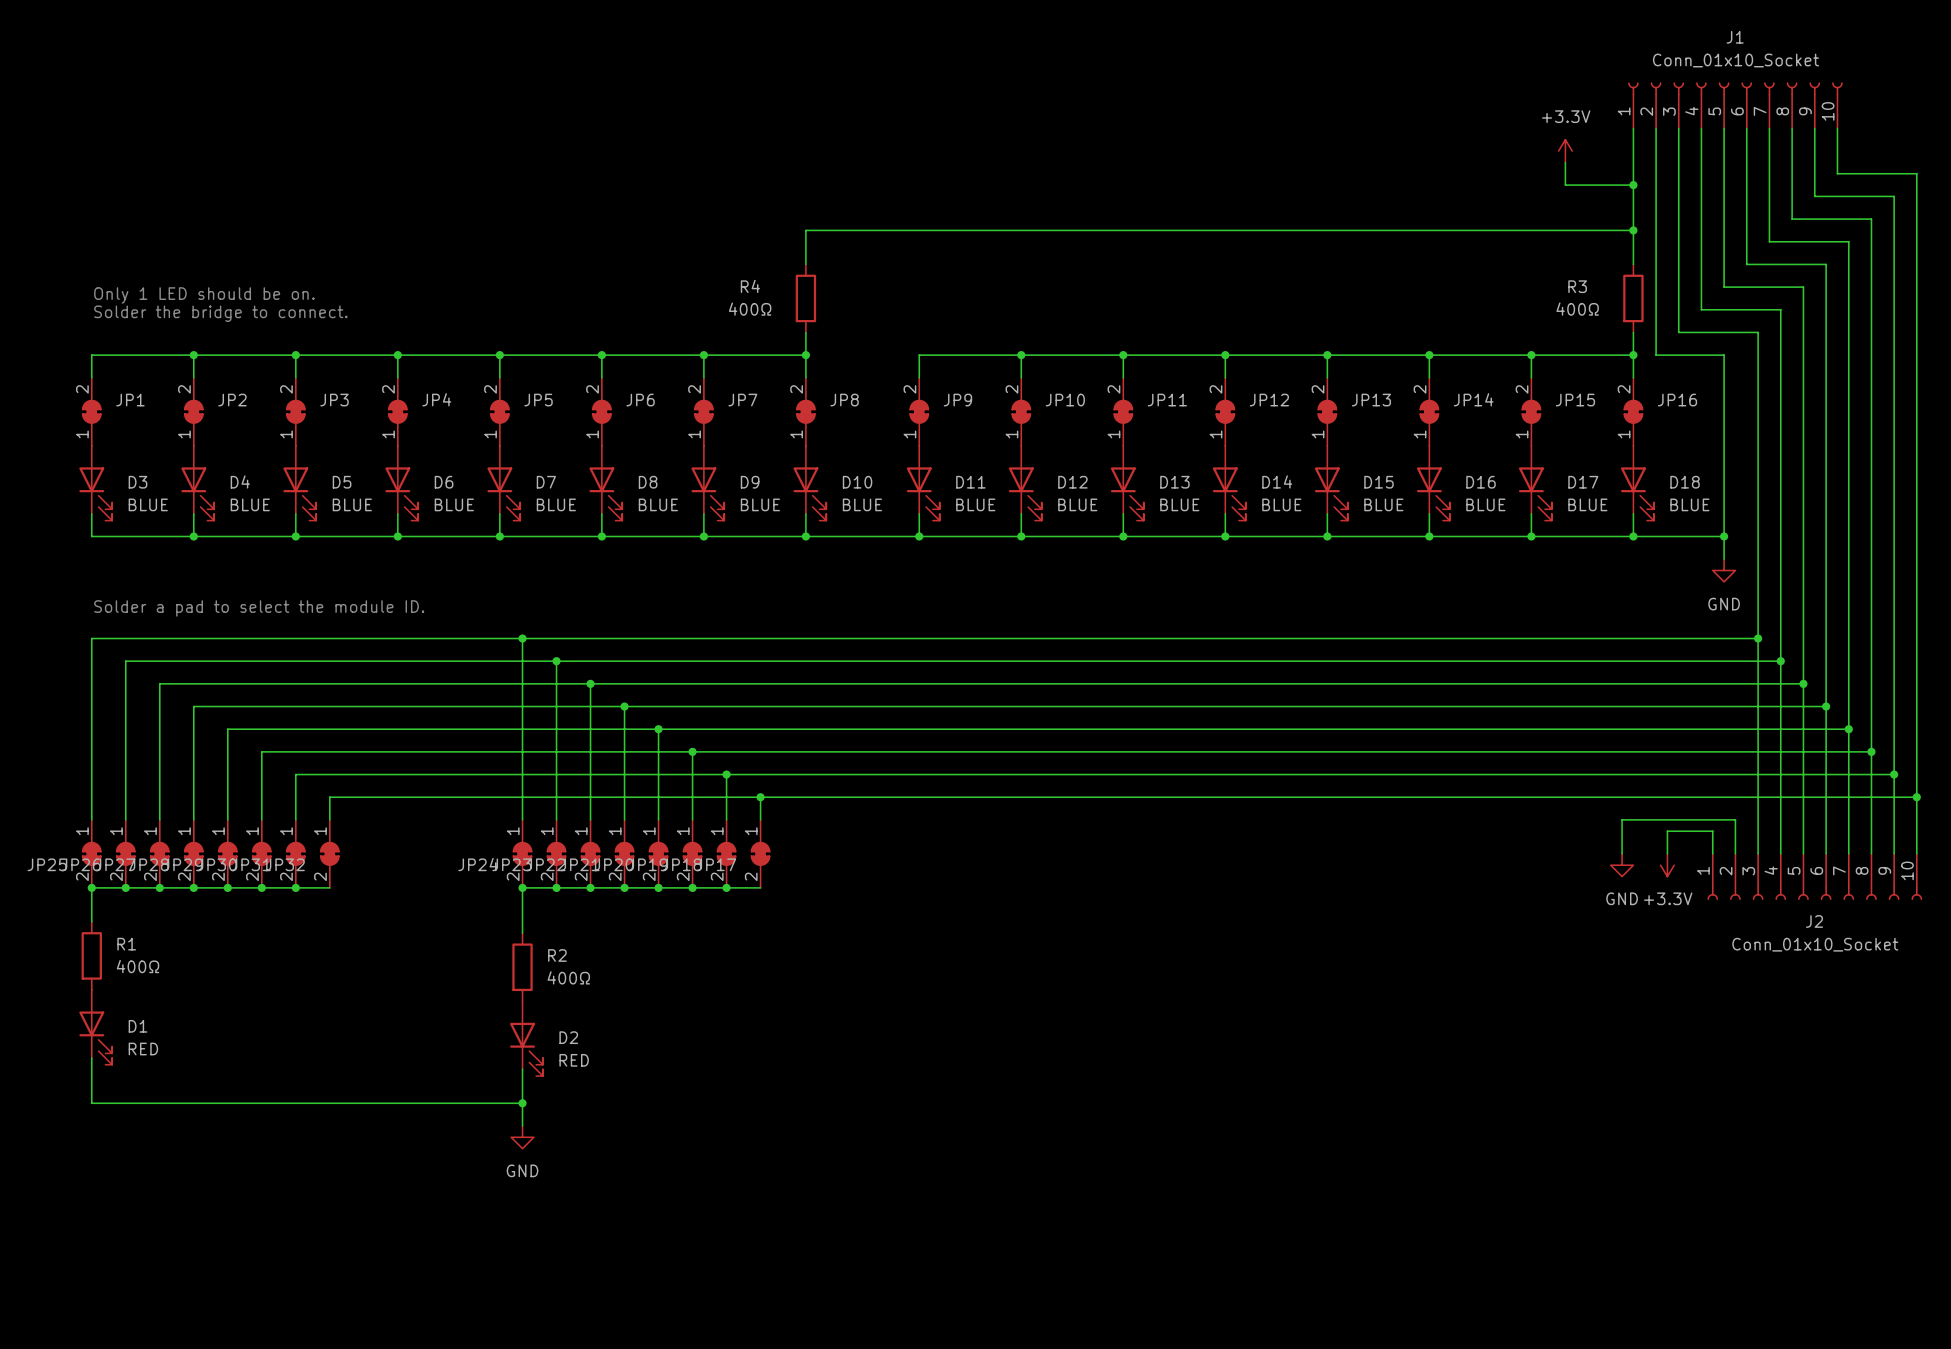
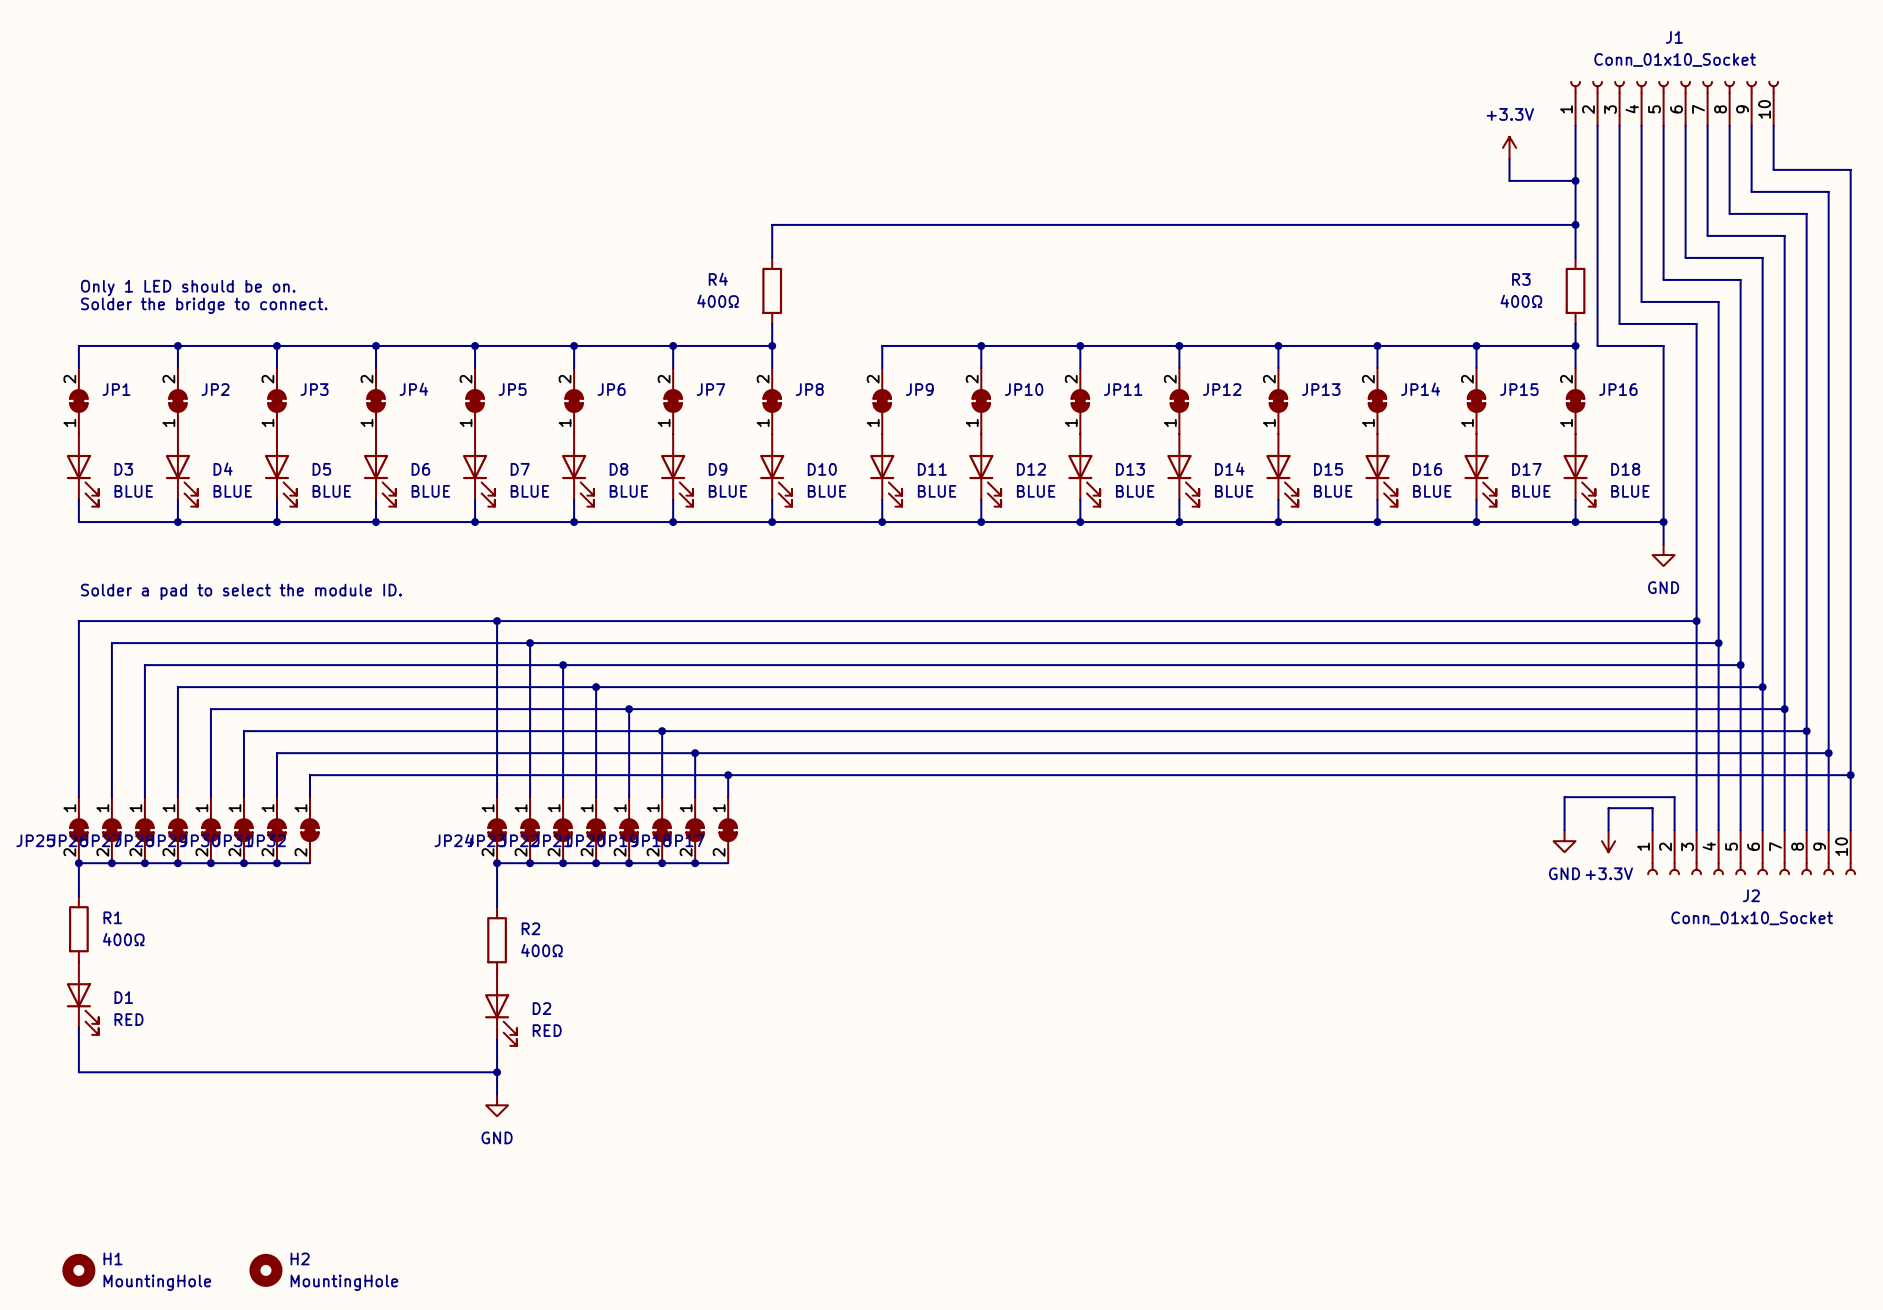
H1: none -> MountingHole (78, 1270)
H2: none -> MountingHole (265, 1270)

